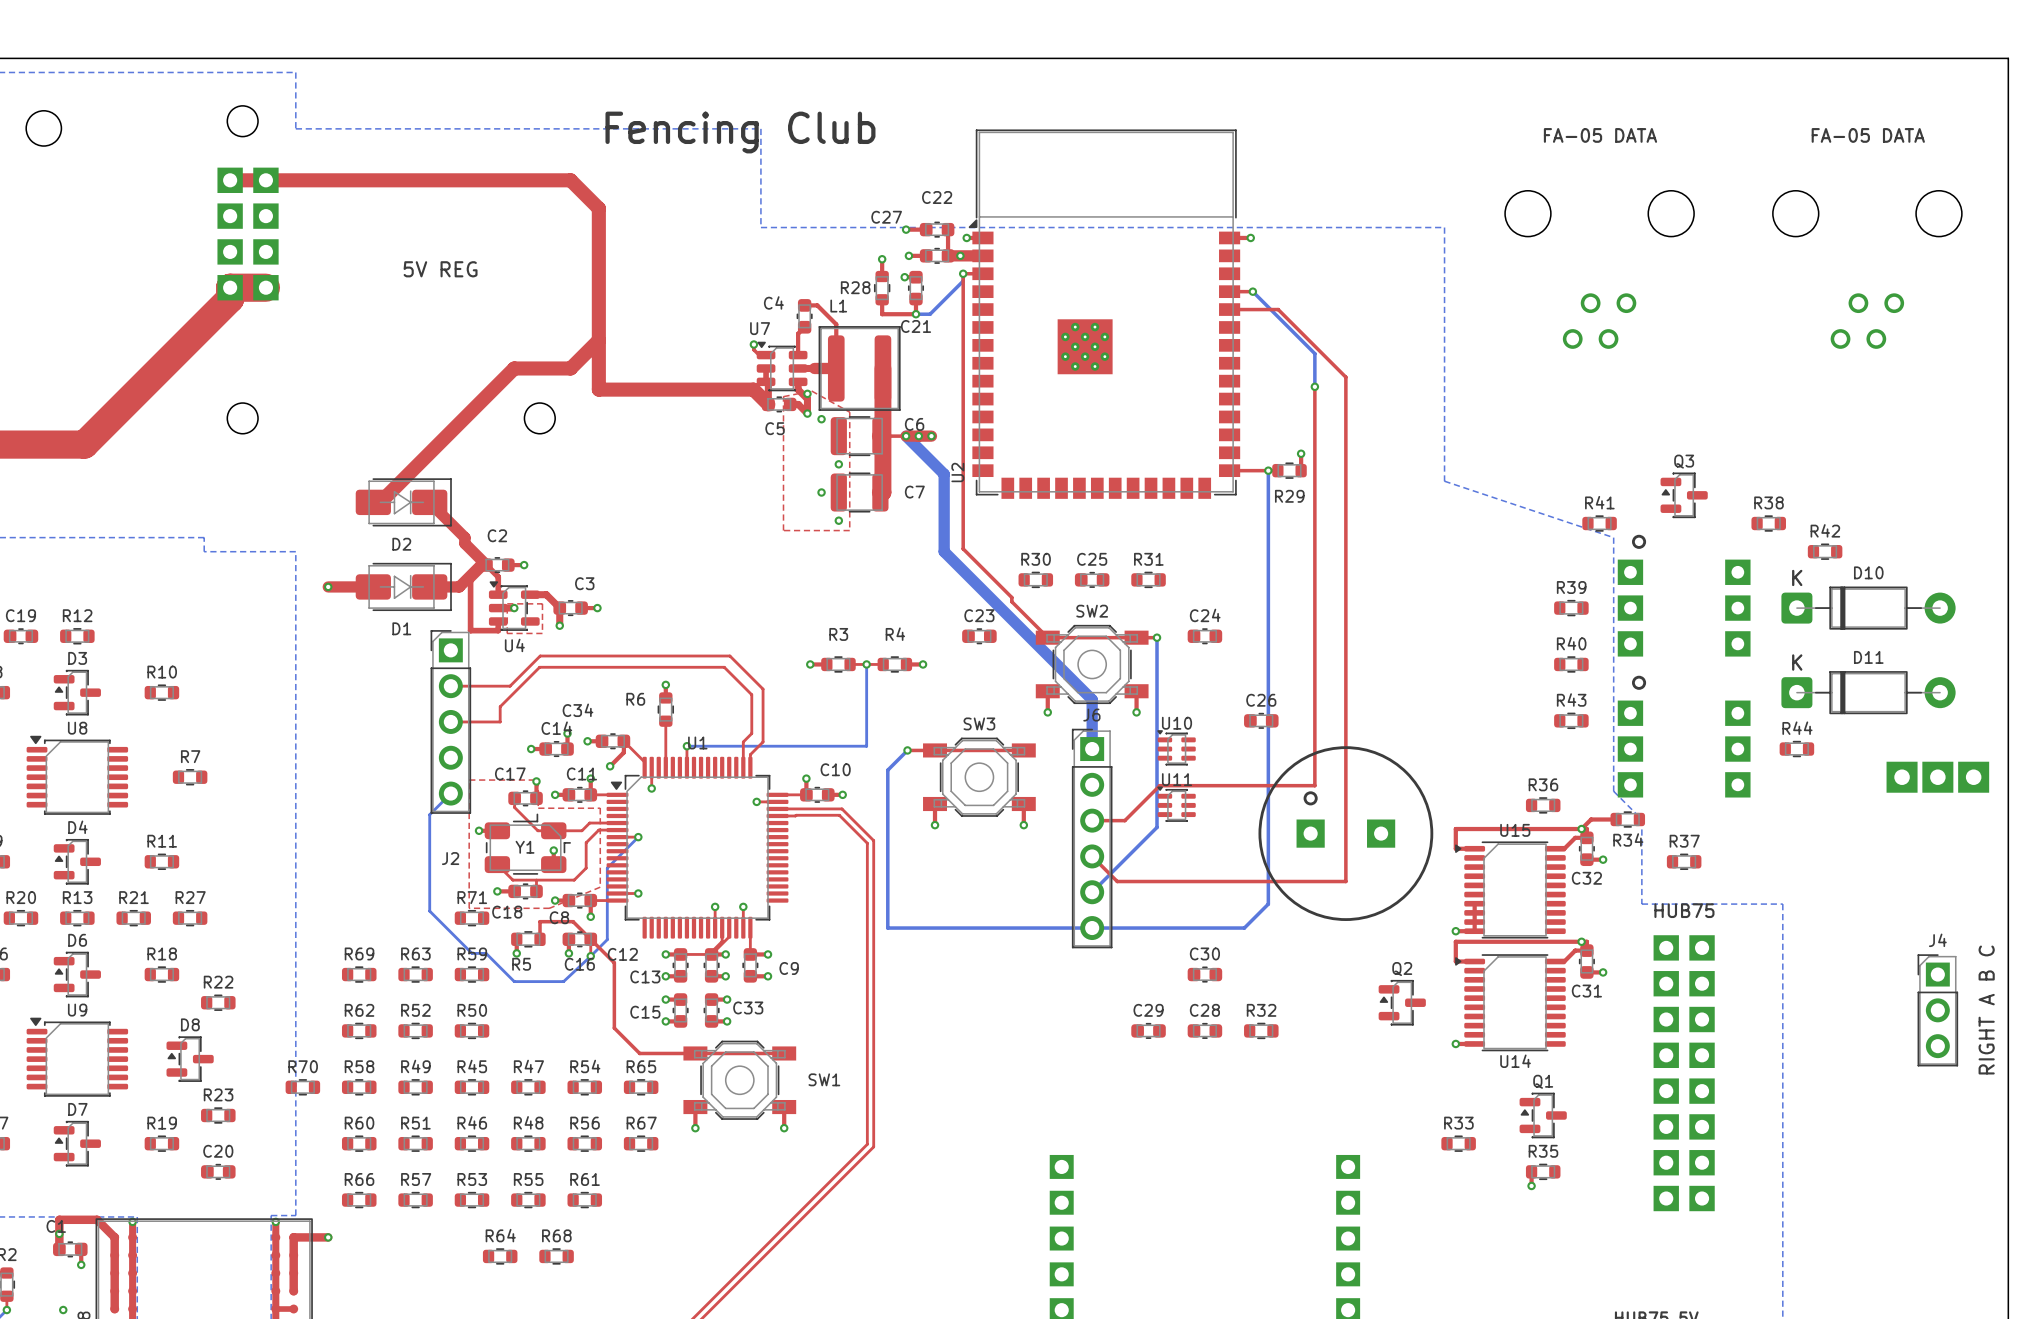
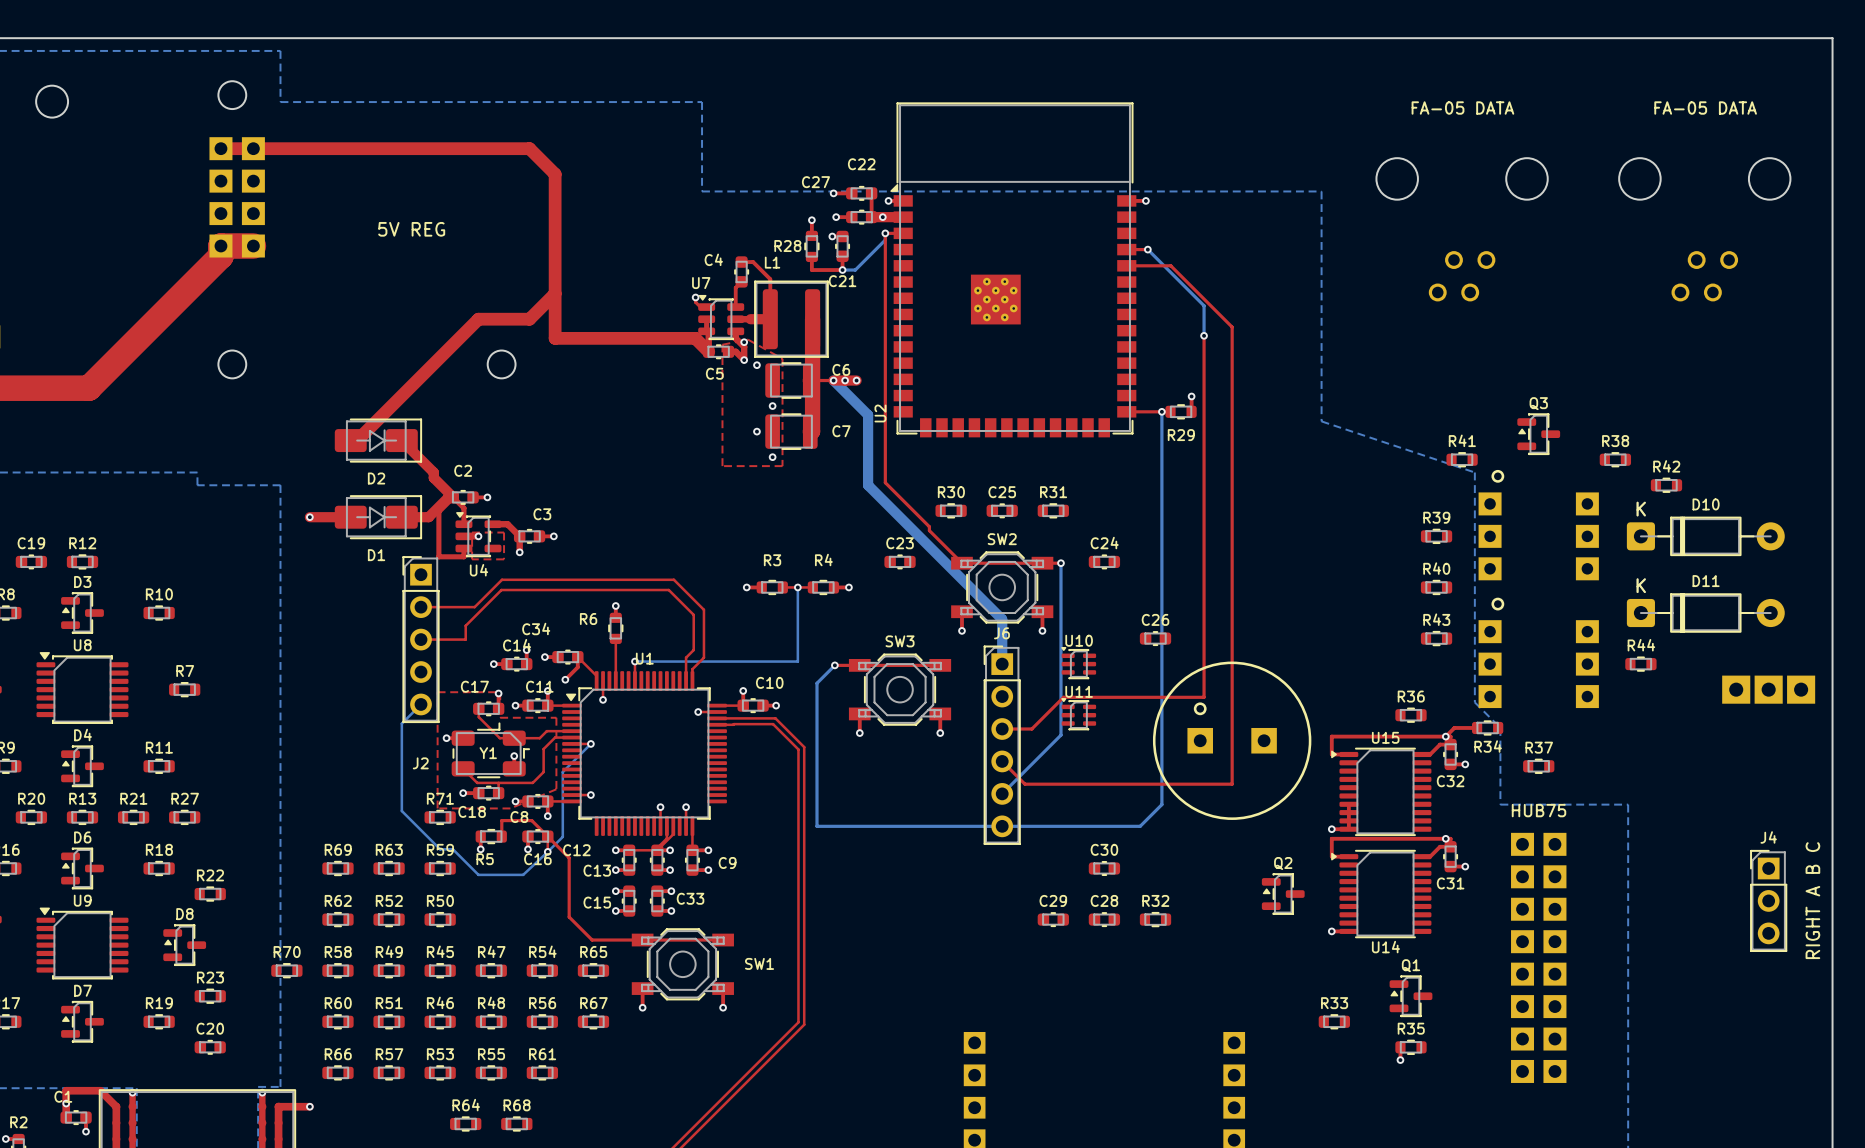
text: Fencing Club (740, 132) -> none

